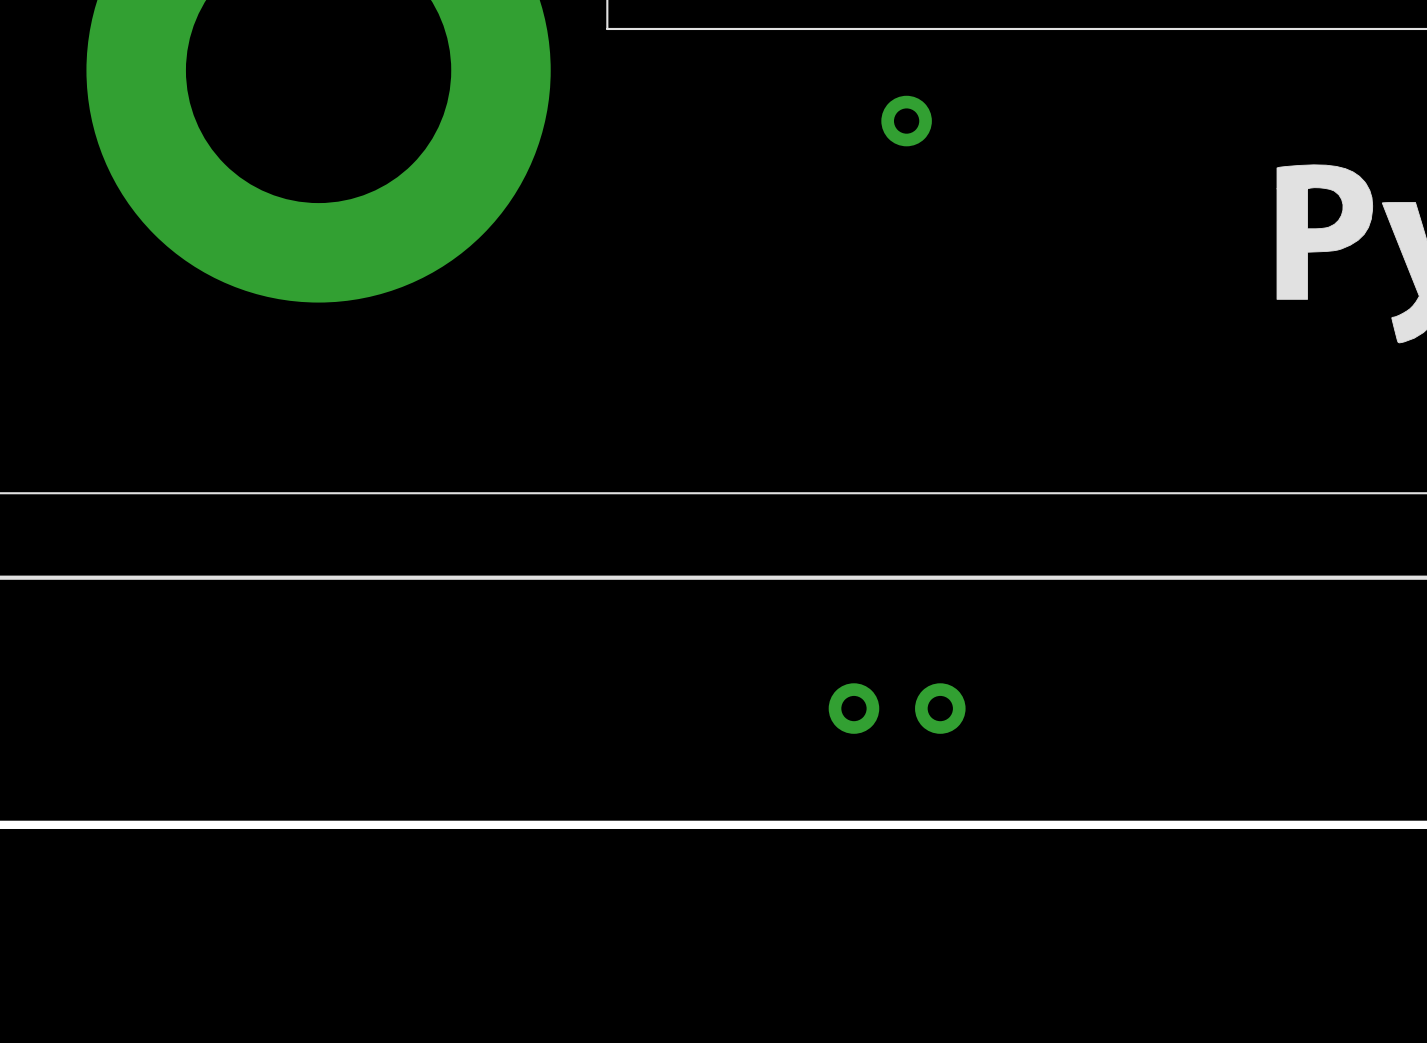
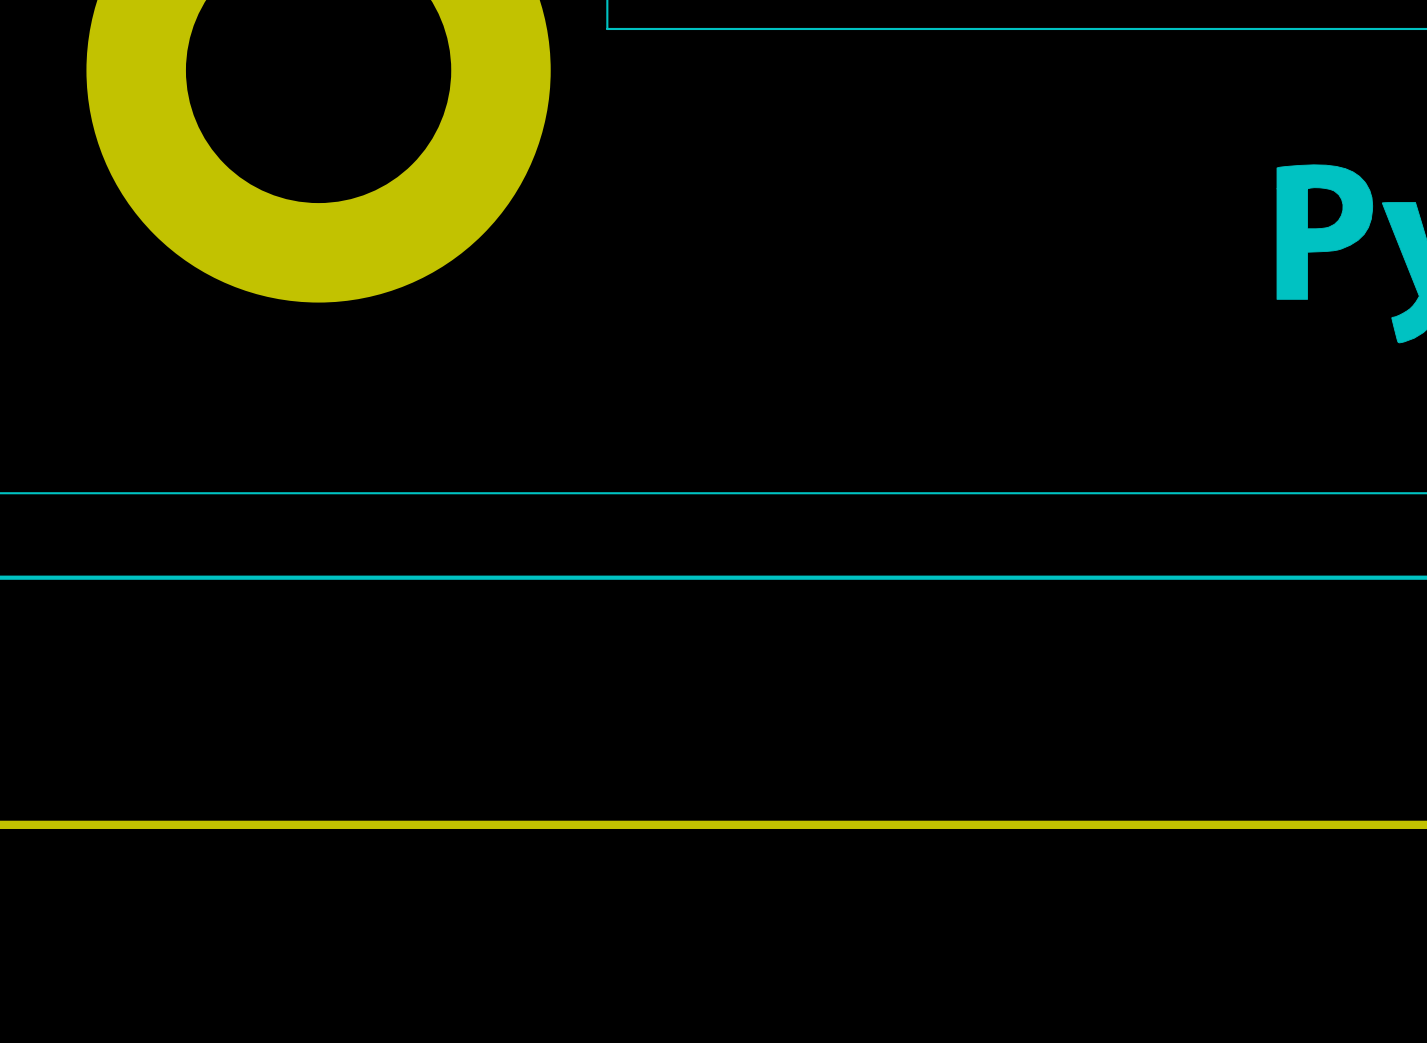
via: (906, 121) -> none
via: (853, 708) -> none
via: (940, 708) -> none

